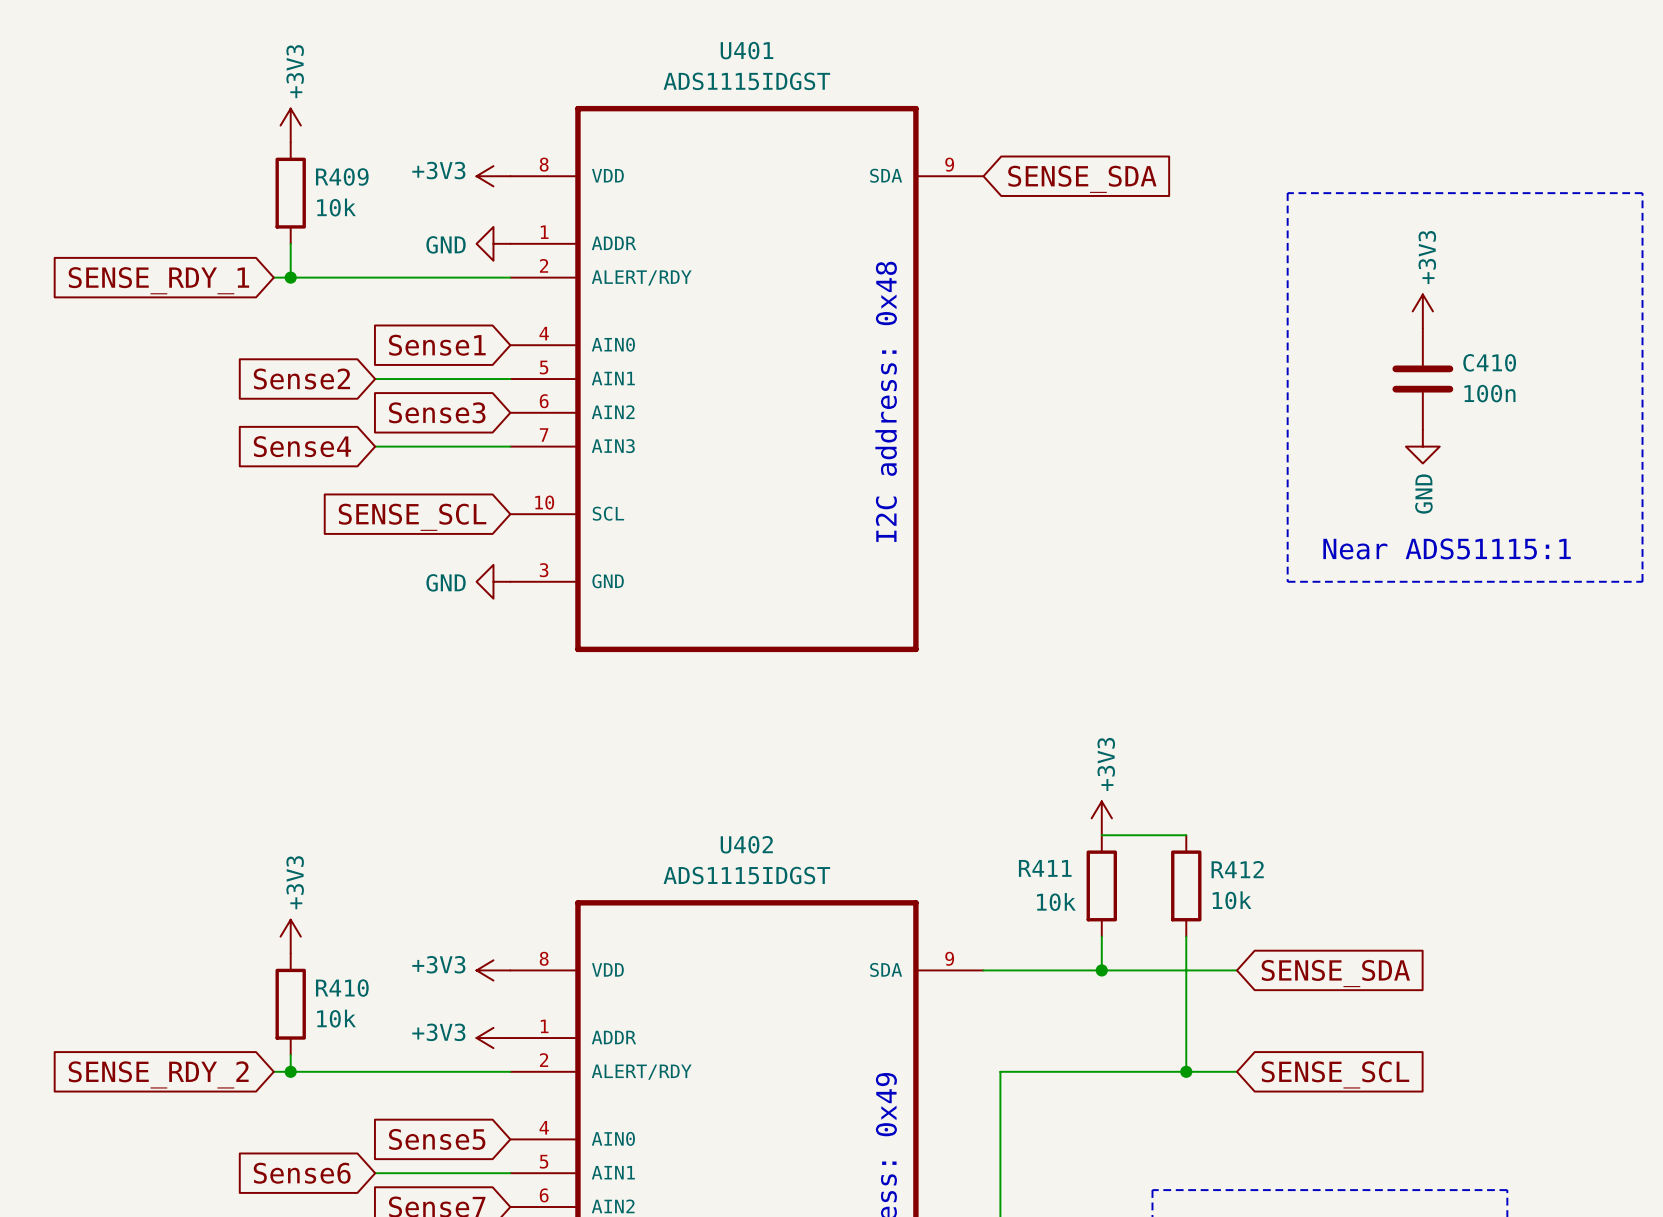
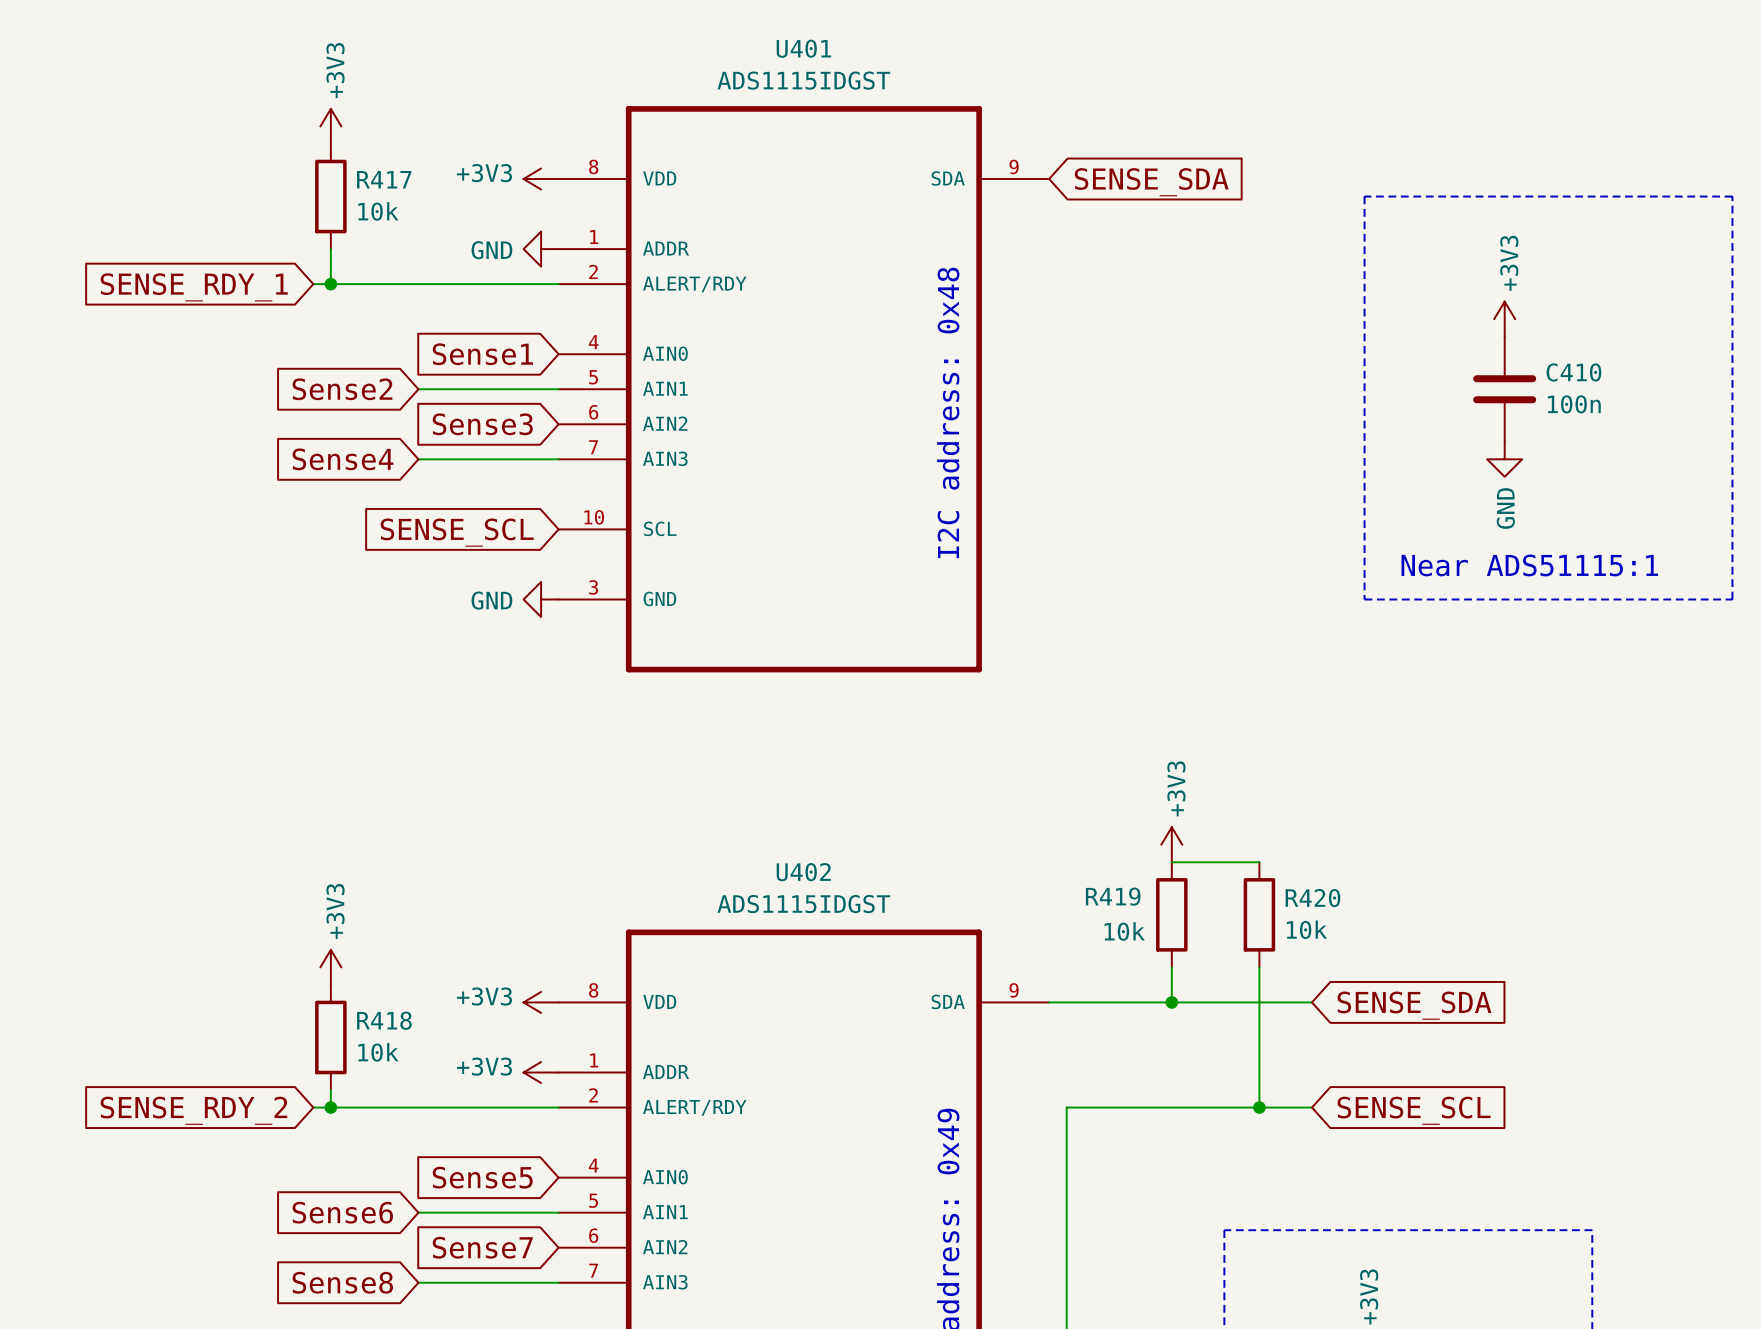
R409 name: R409 (342, 176) -> R417 (384, 179)
R411 name: R411 (1045, 868) -> R419 (1113, 896)
R412 name: R412 (1237, 869) -> R420 (1312, 898)
R410 name: R410 (342, 988) -> R418 (384, 1020)

